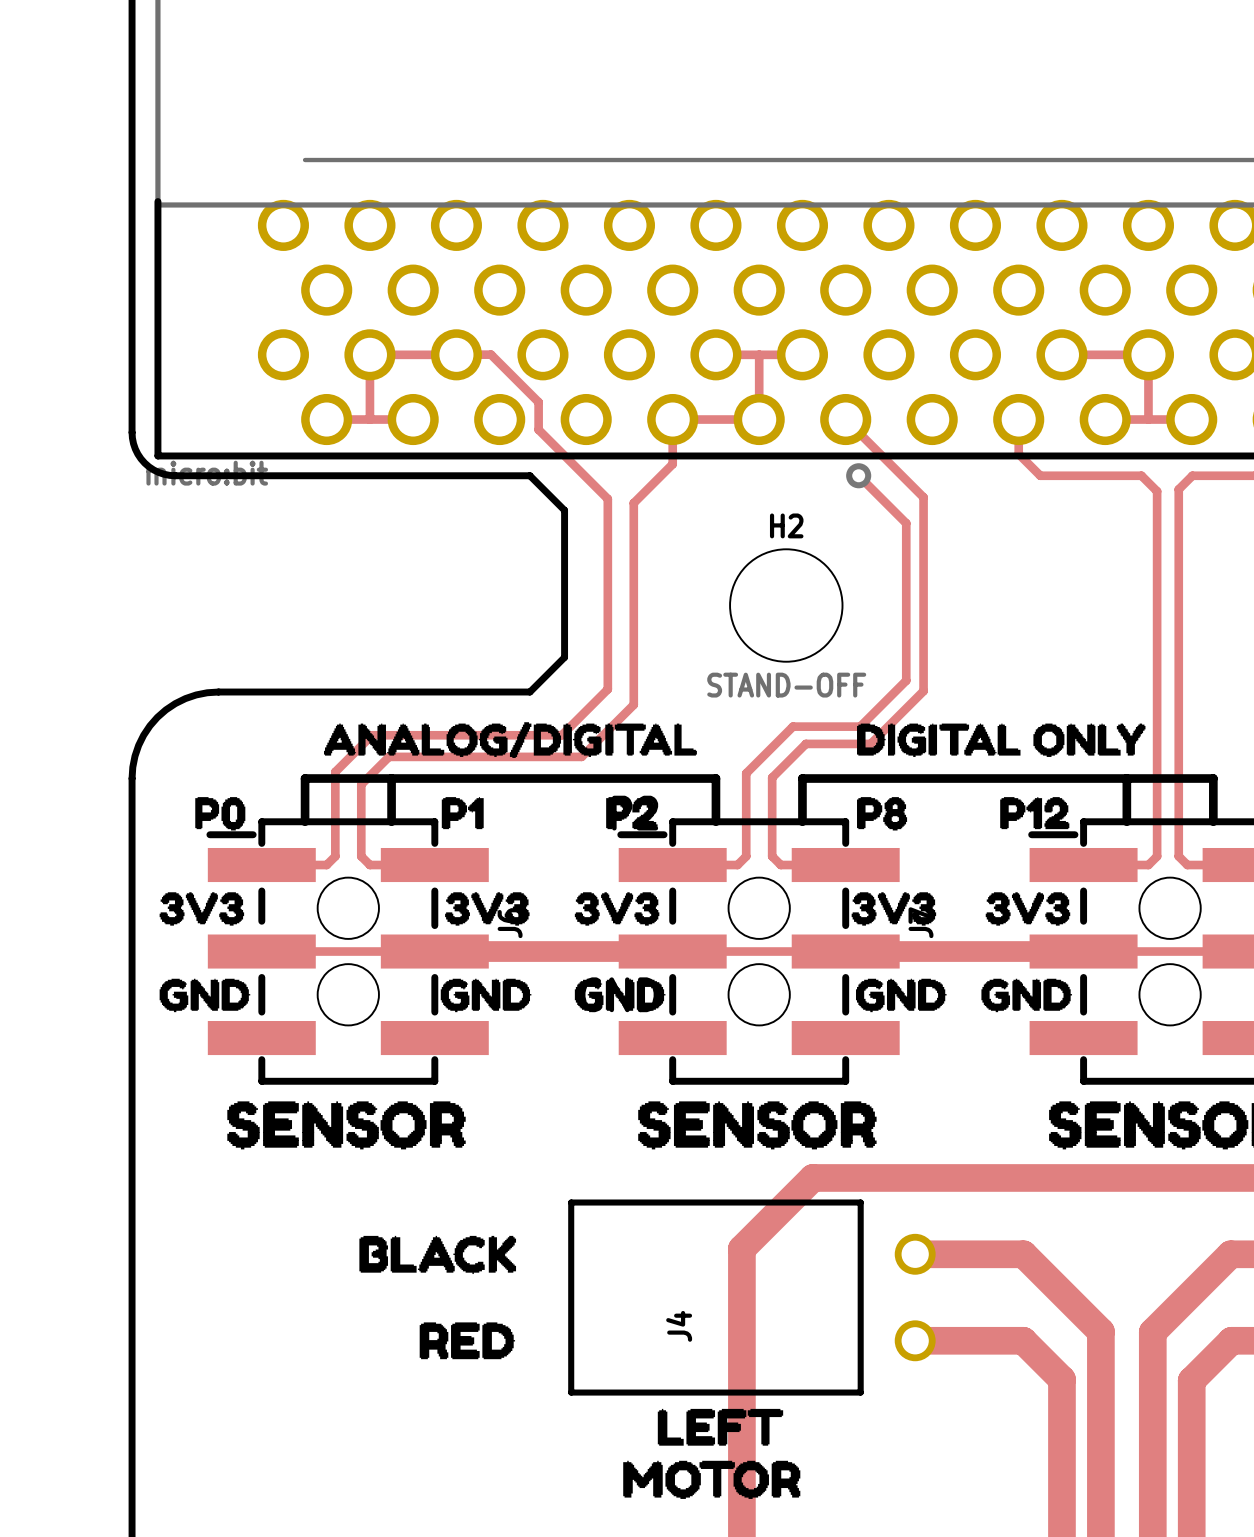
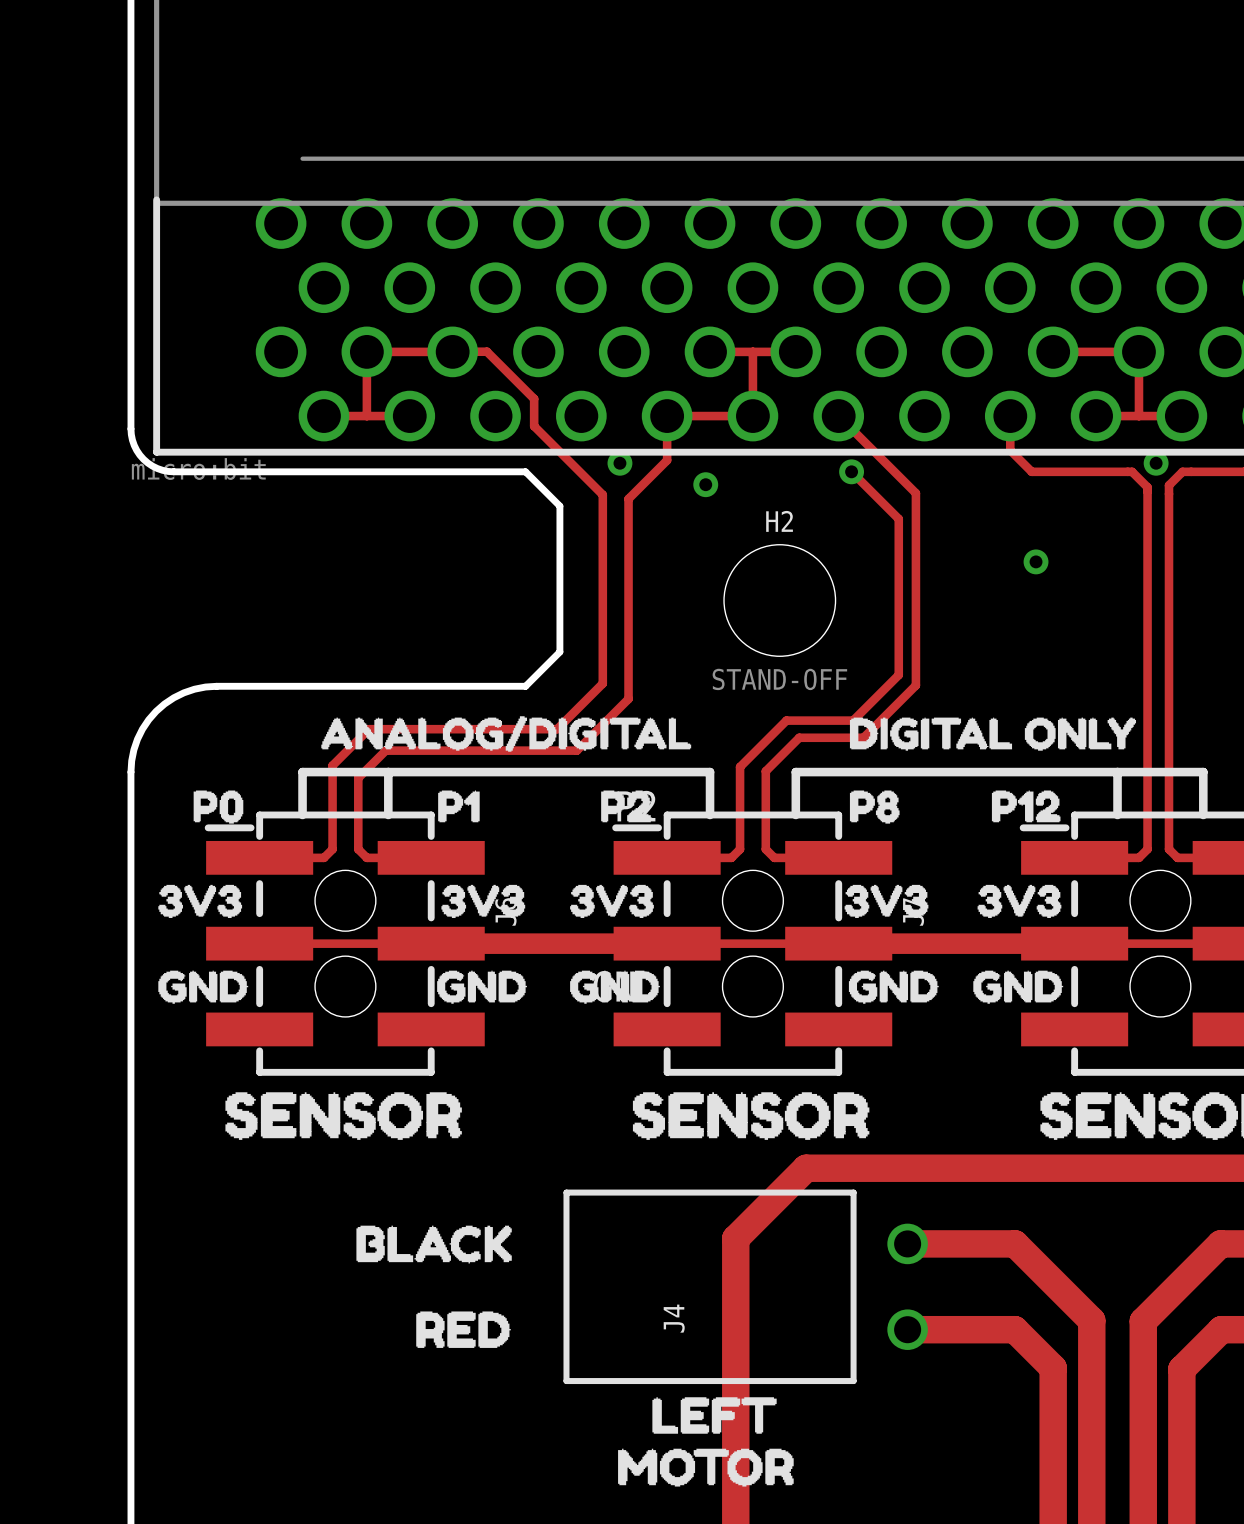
via: none -> (619, 463)
via: none -> (1156, 463)
via: none -> (705, 484)
via: none -> (1036, 561)

